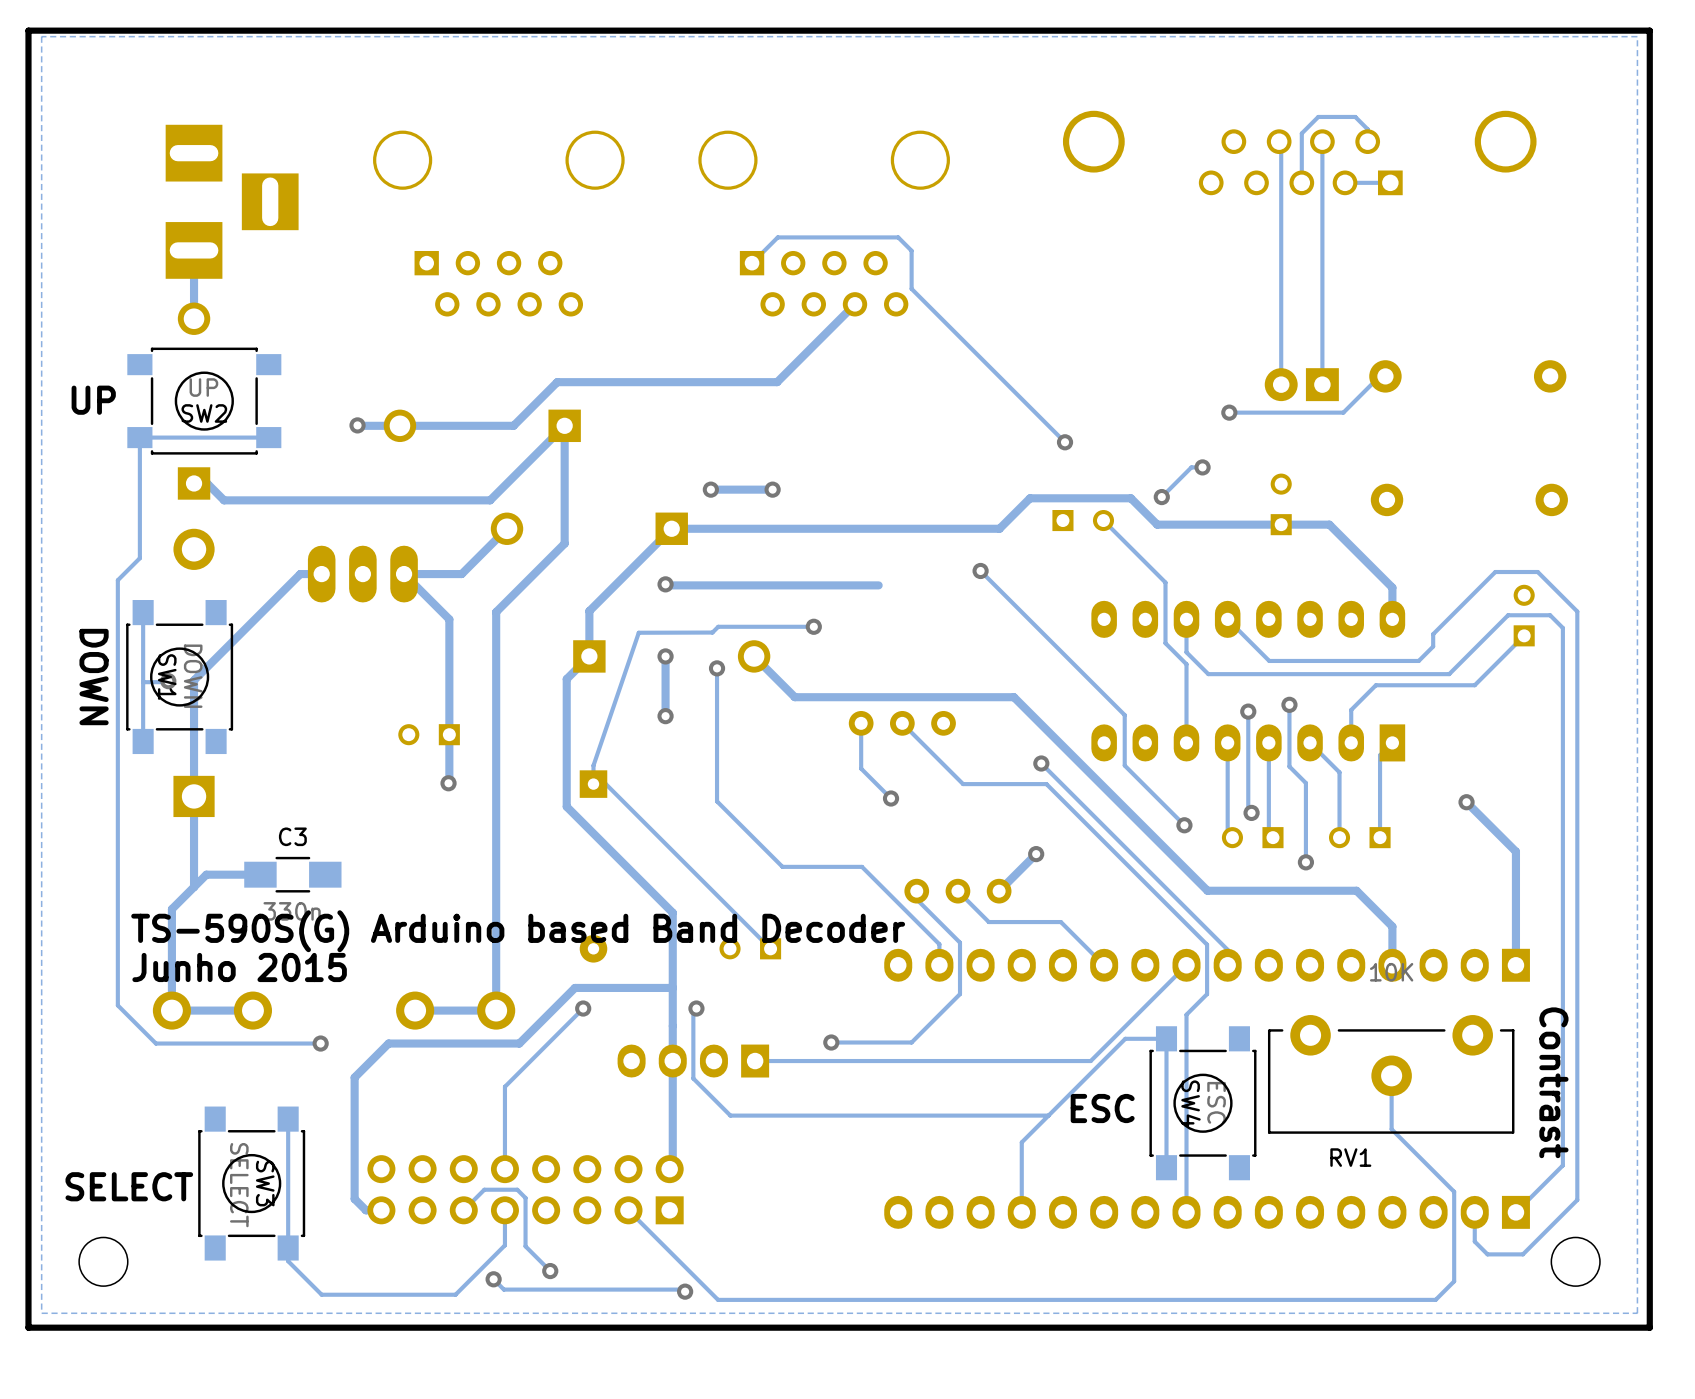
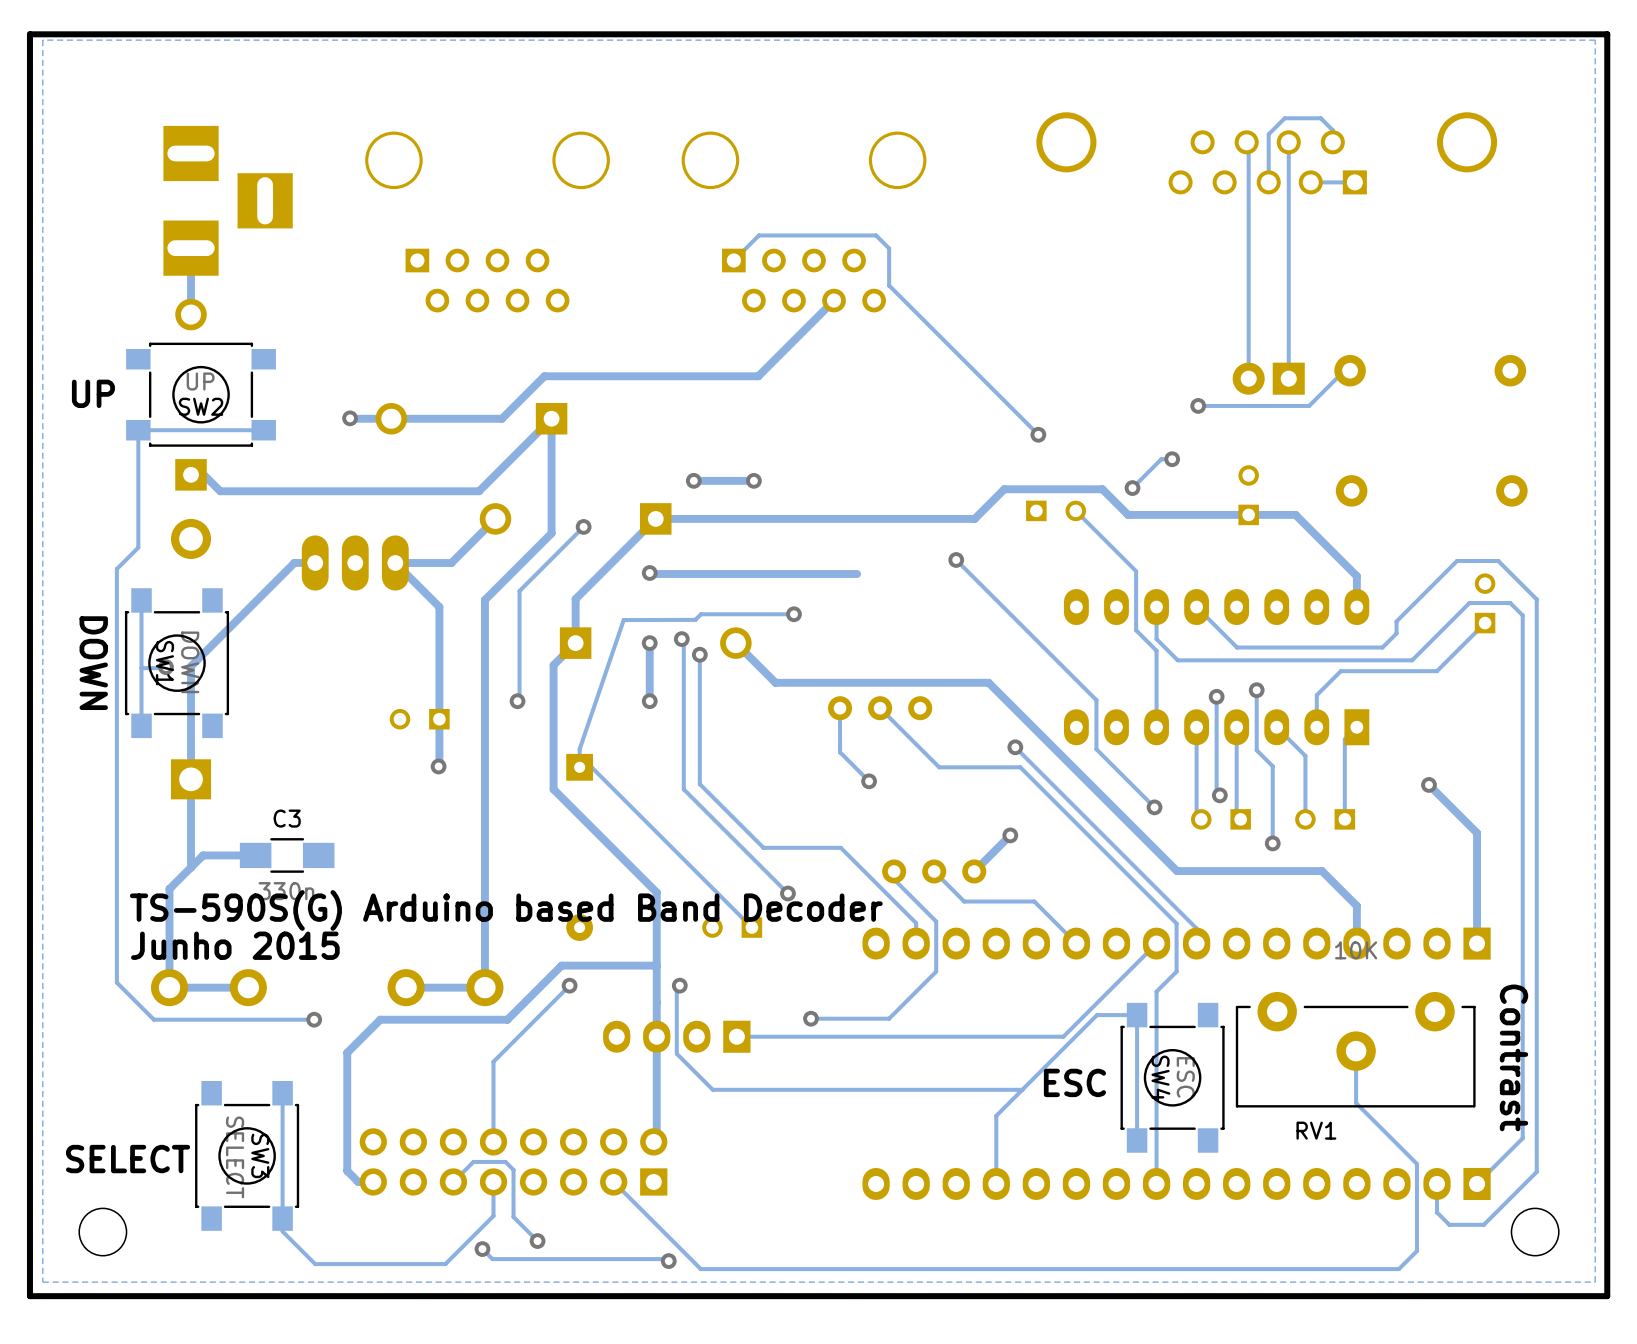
track: none -> (583, 526) (519, 591) (519, 699) (517, 701)
via: none -> (583, 526)
track: none -> (681, 639) (683, 641) (683, 789) (787, 893)
via: none -> (681, 639)
via: none -> (517, 701)
via: none -> (787, 893)

